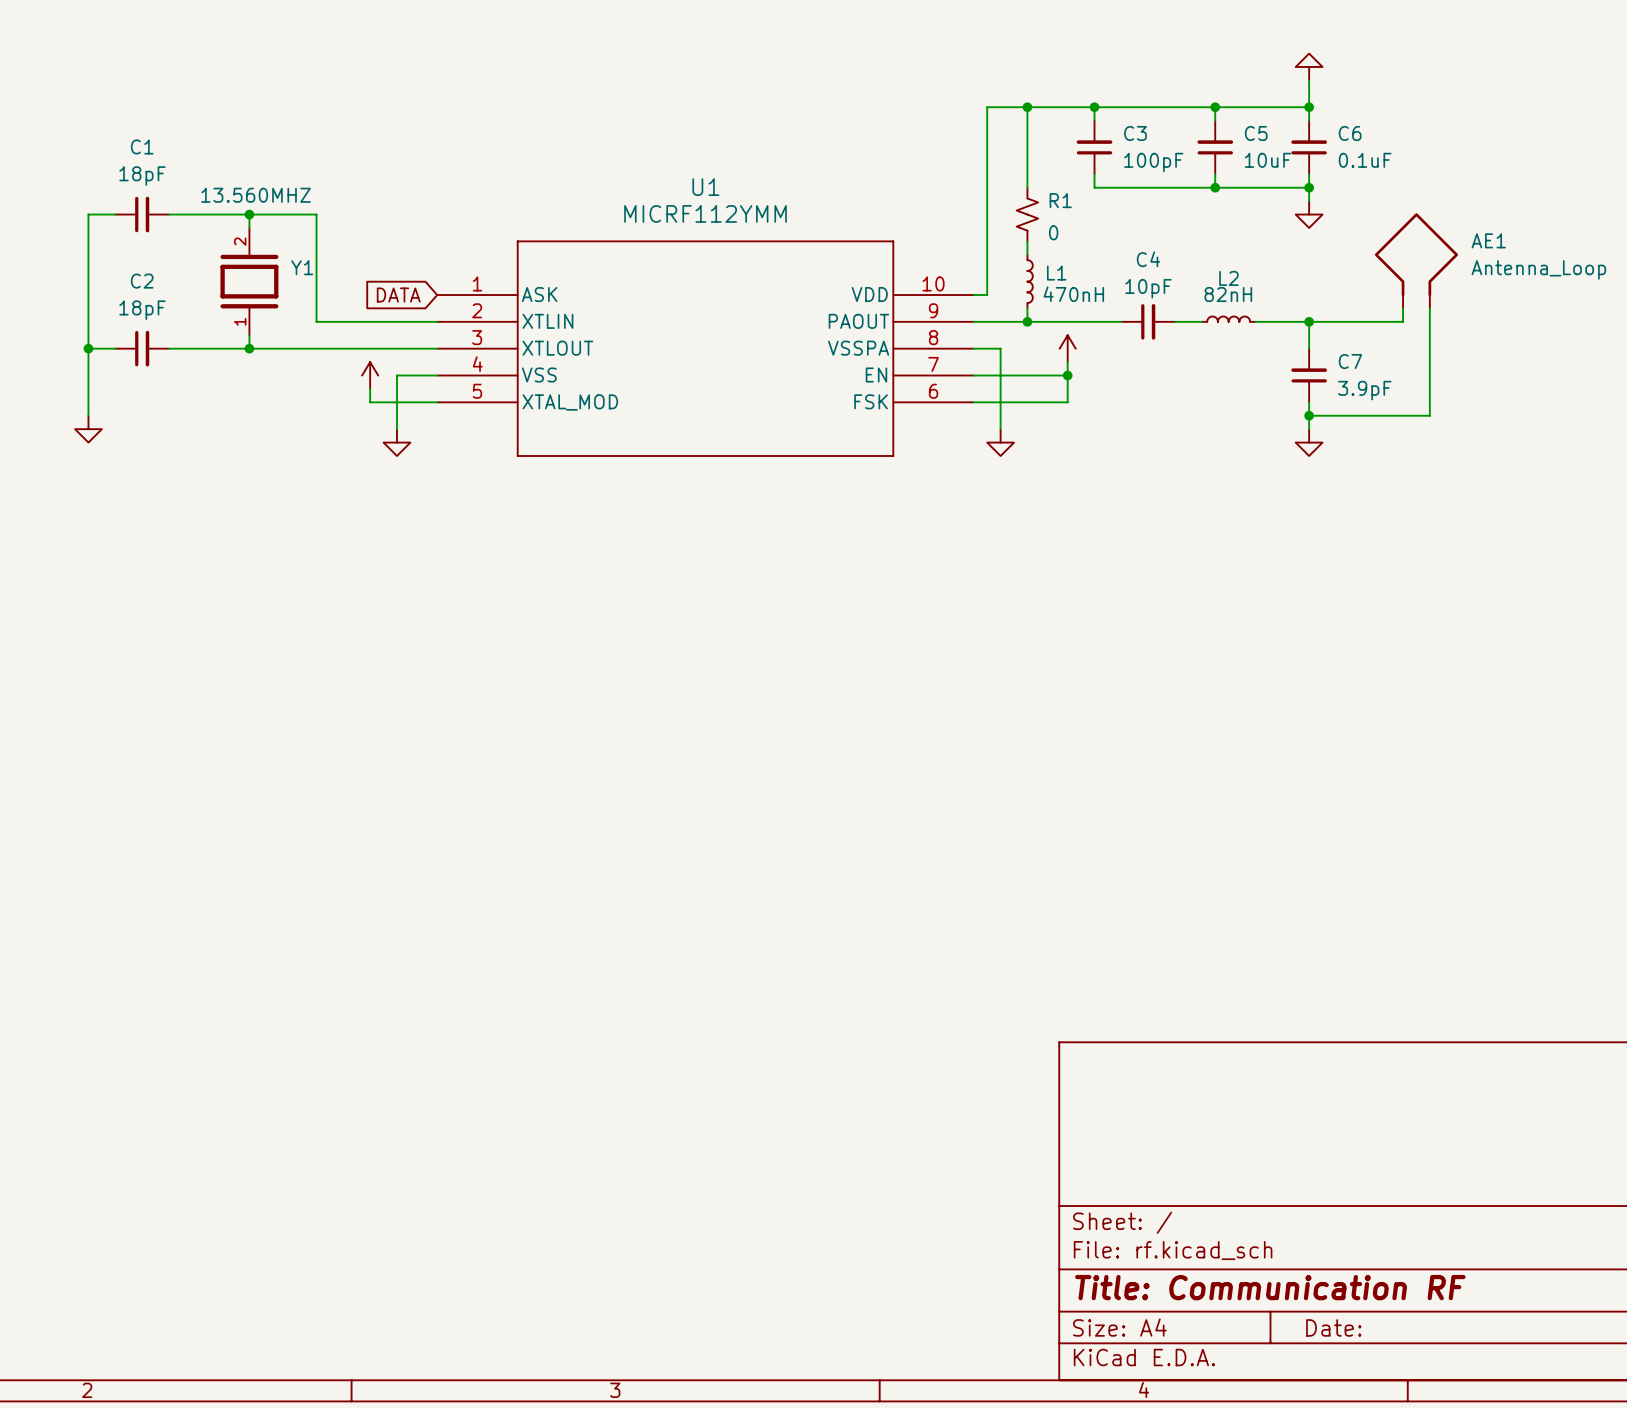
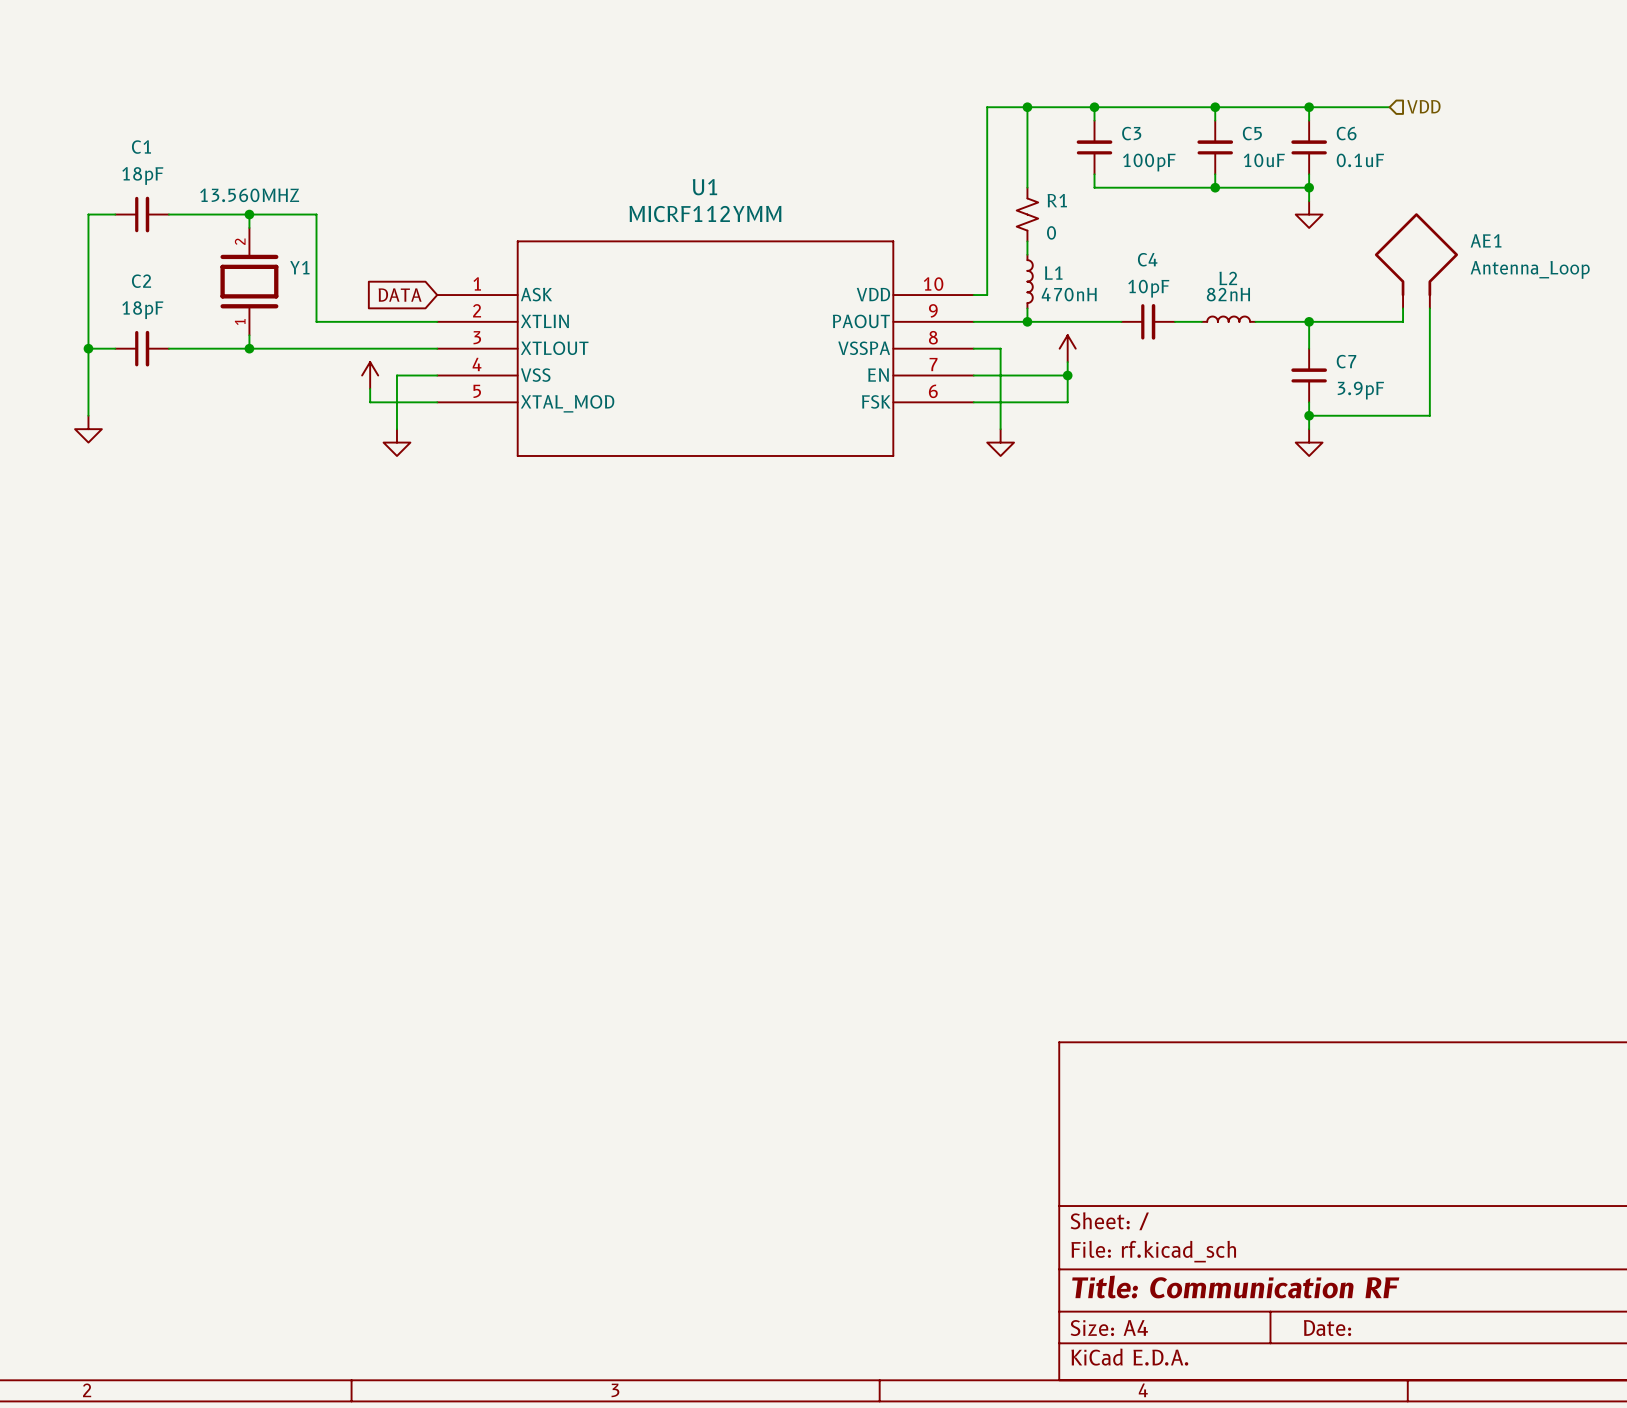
power symbol: (1309, 66) -> none
wire: (1309, 80) (1309, 107) -> (1389, 107) (1309, 107)
hierarchical label: none -> VDD (1423, 106)

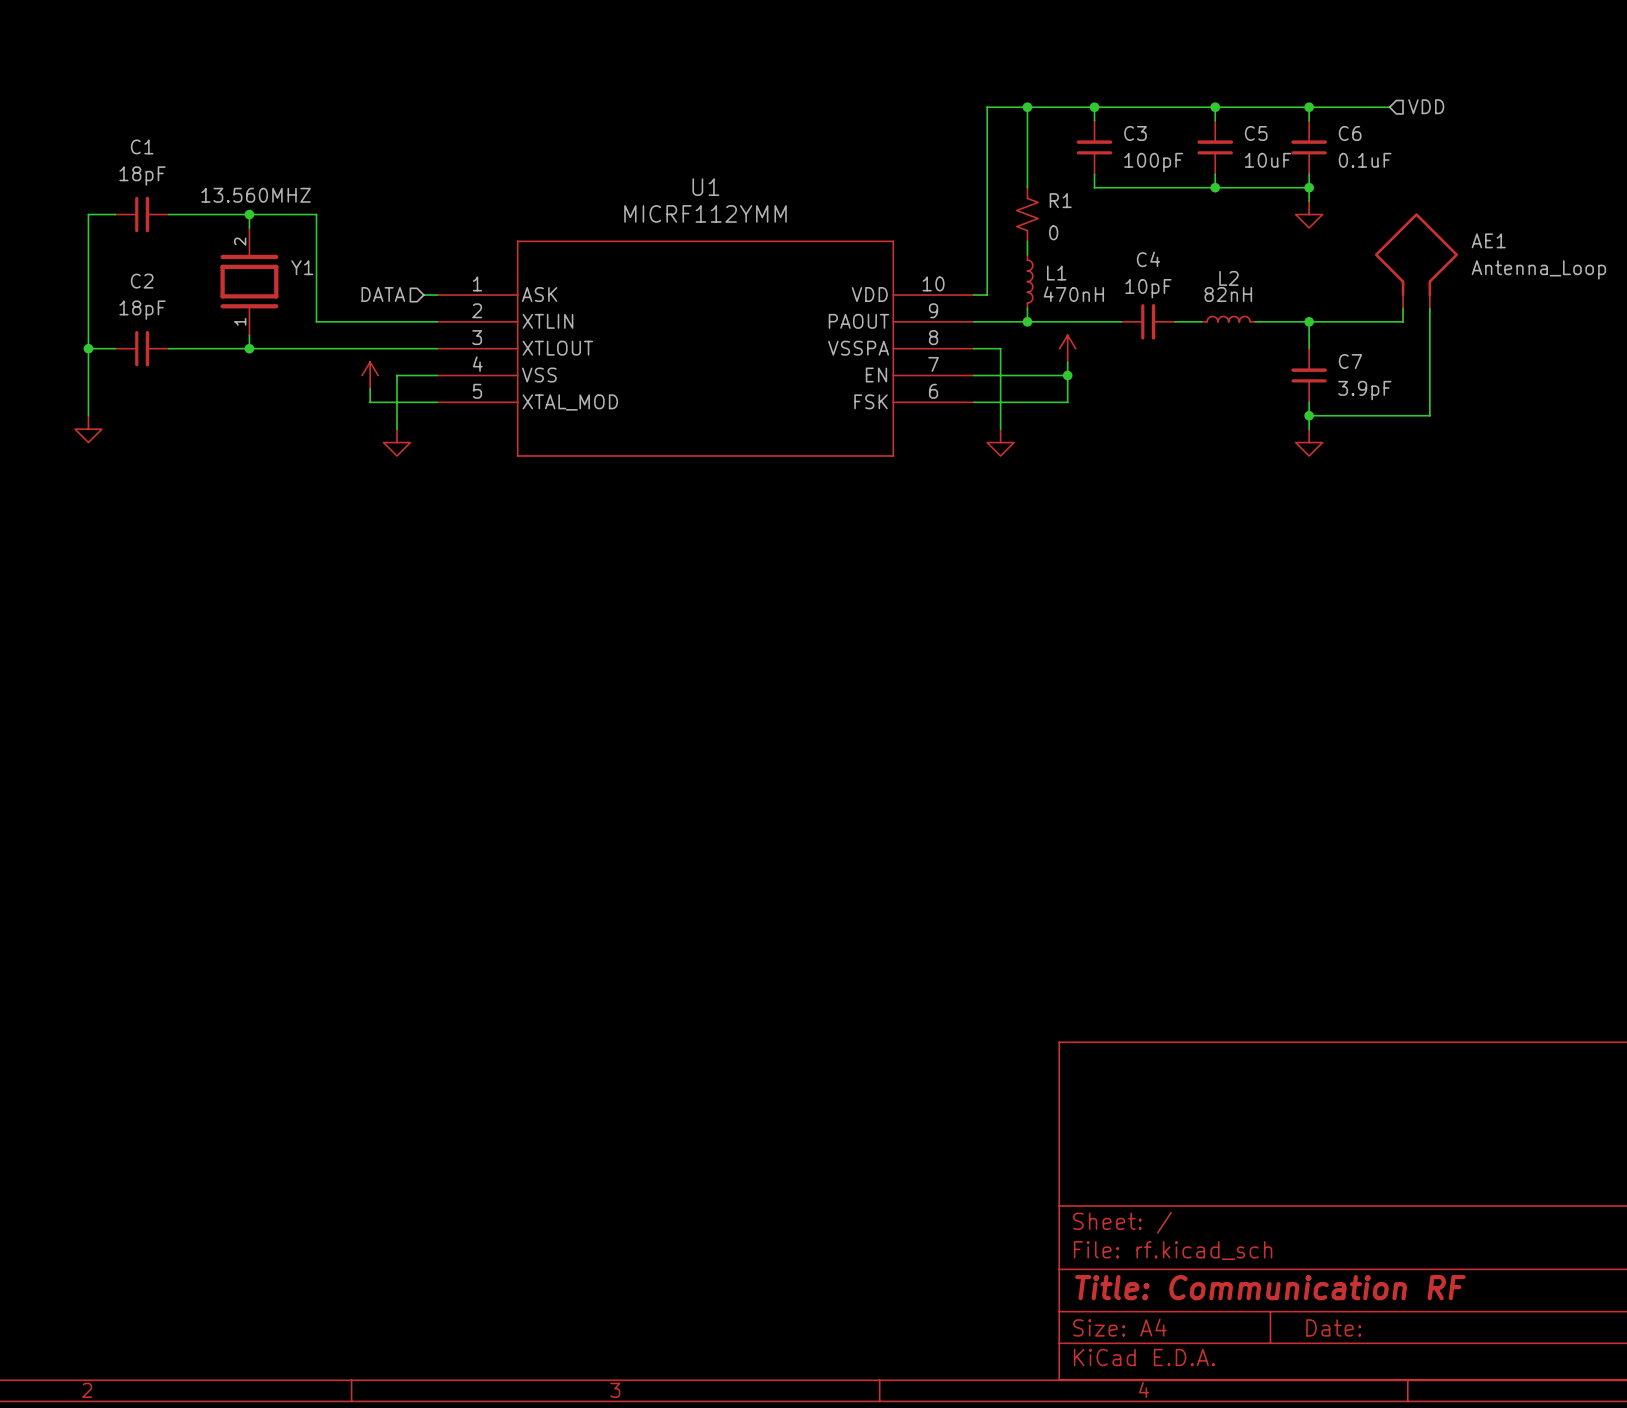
hierarchical label: none -> DATA (383, 294)
global label: DATA (400, 295) -> none
wire: none -> (423, 295) (437, 295)

